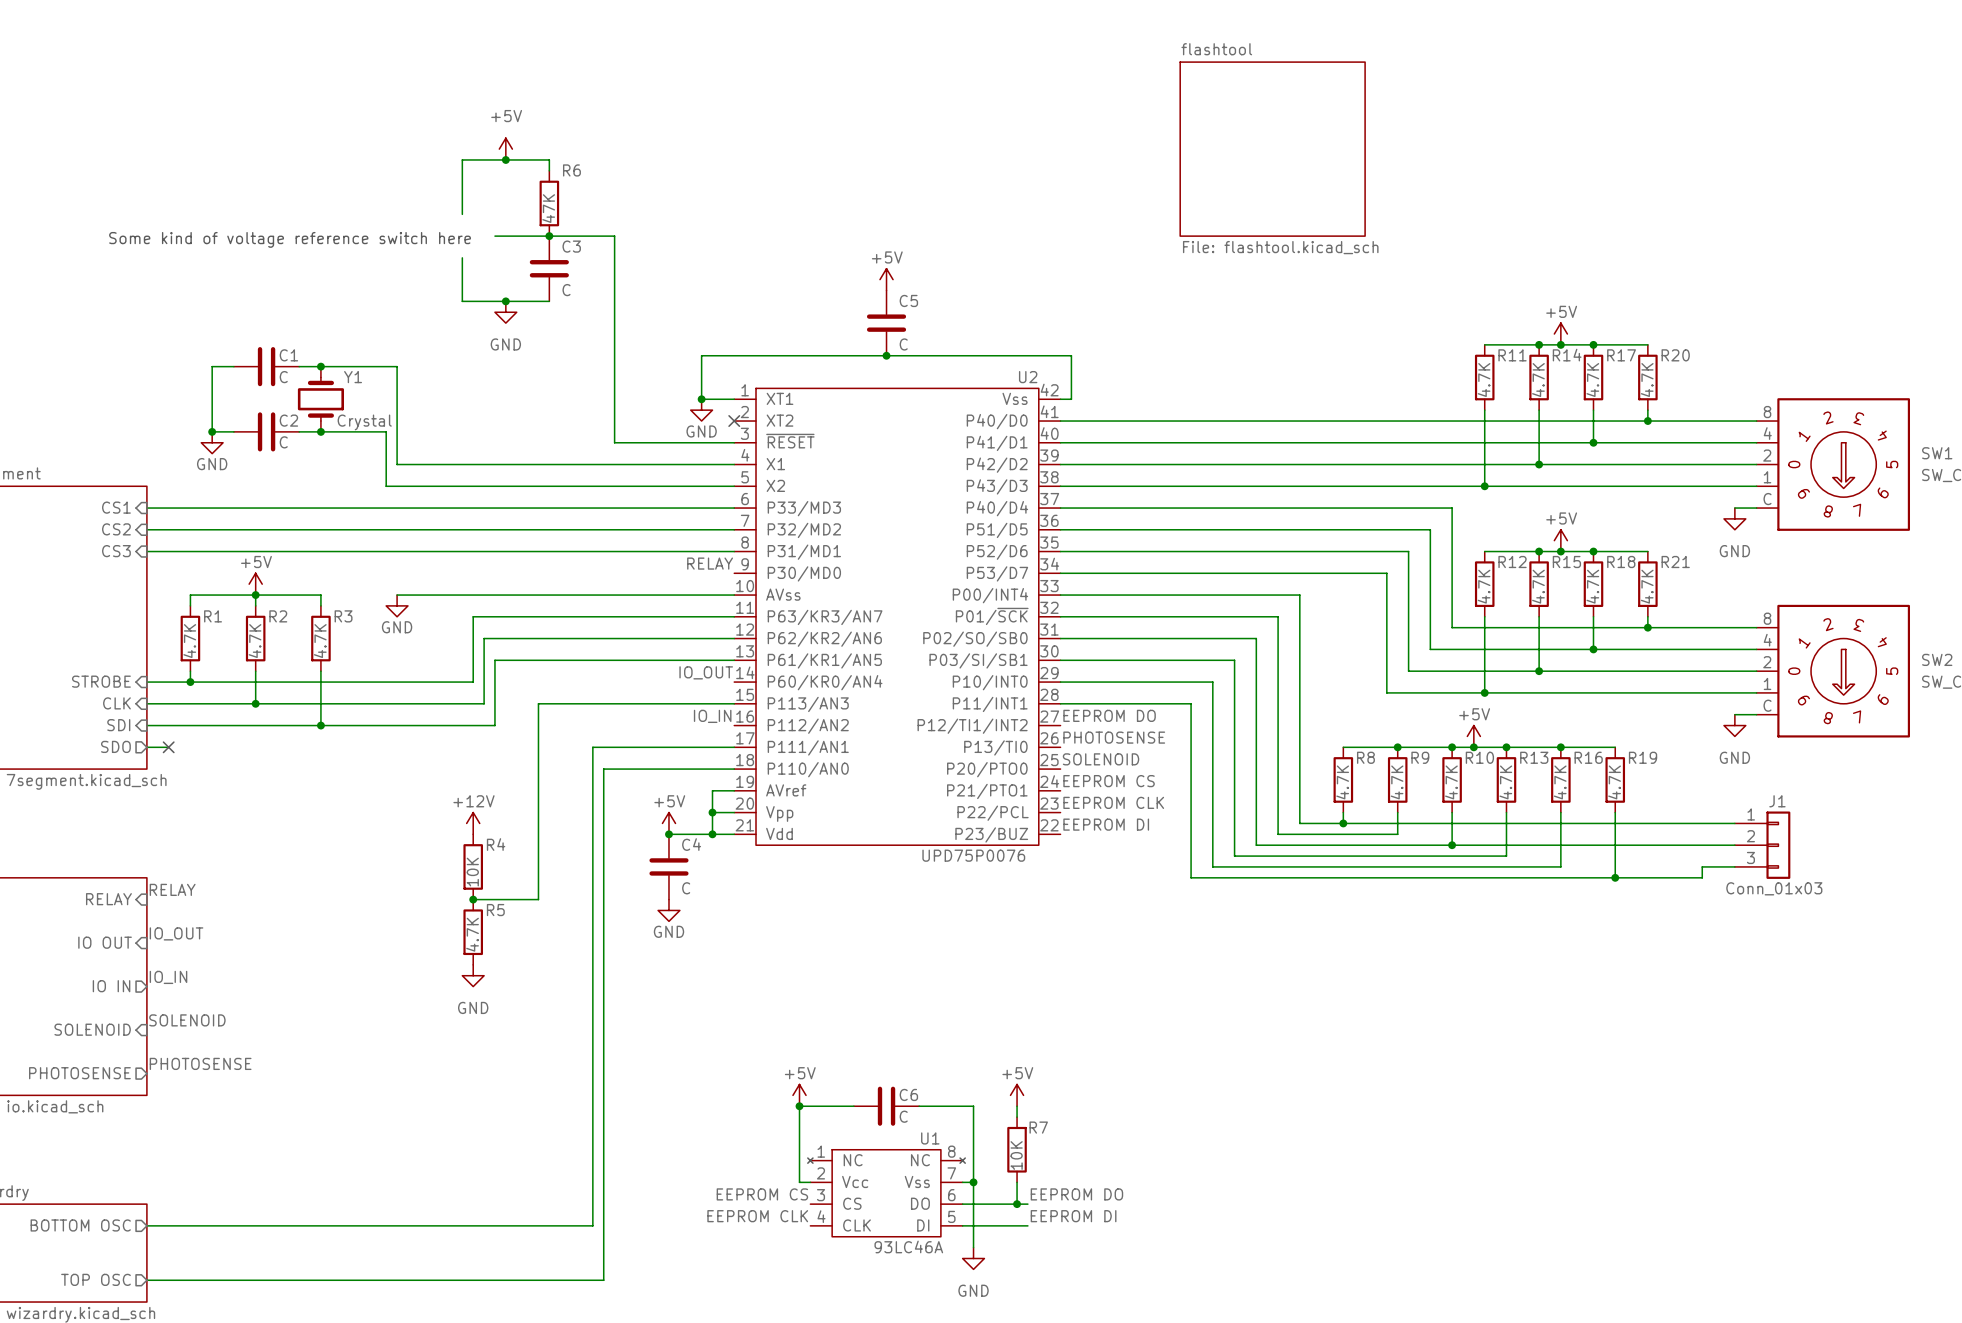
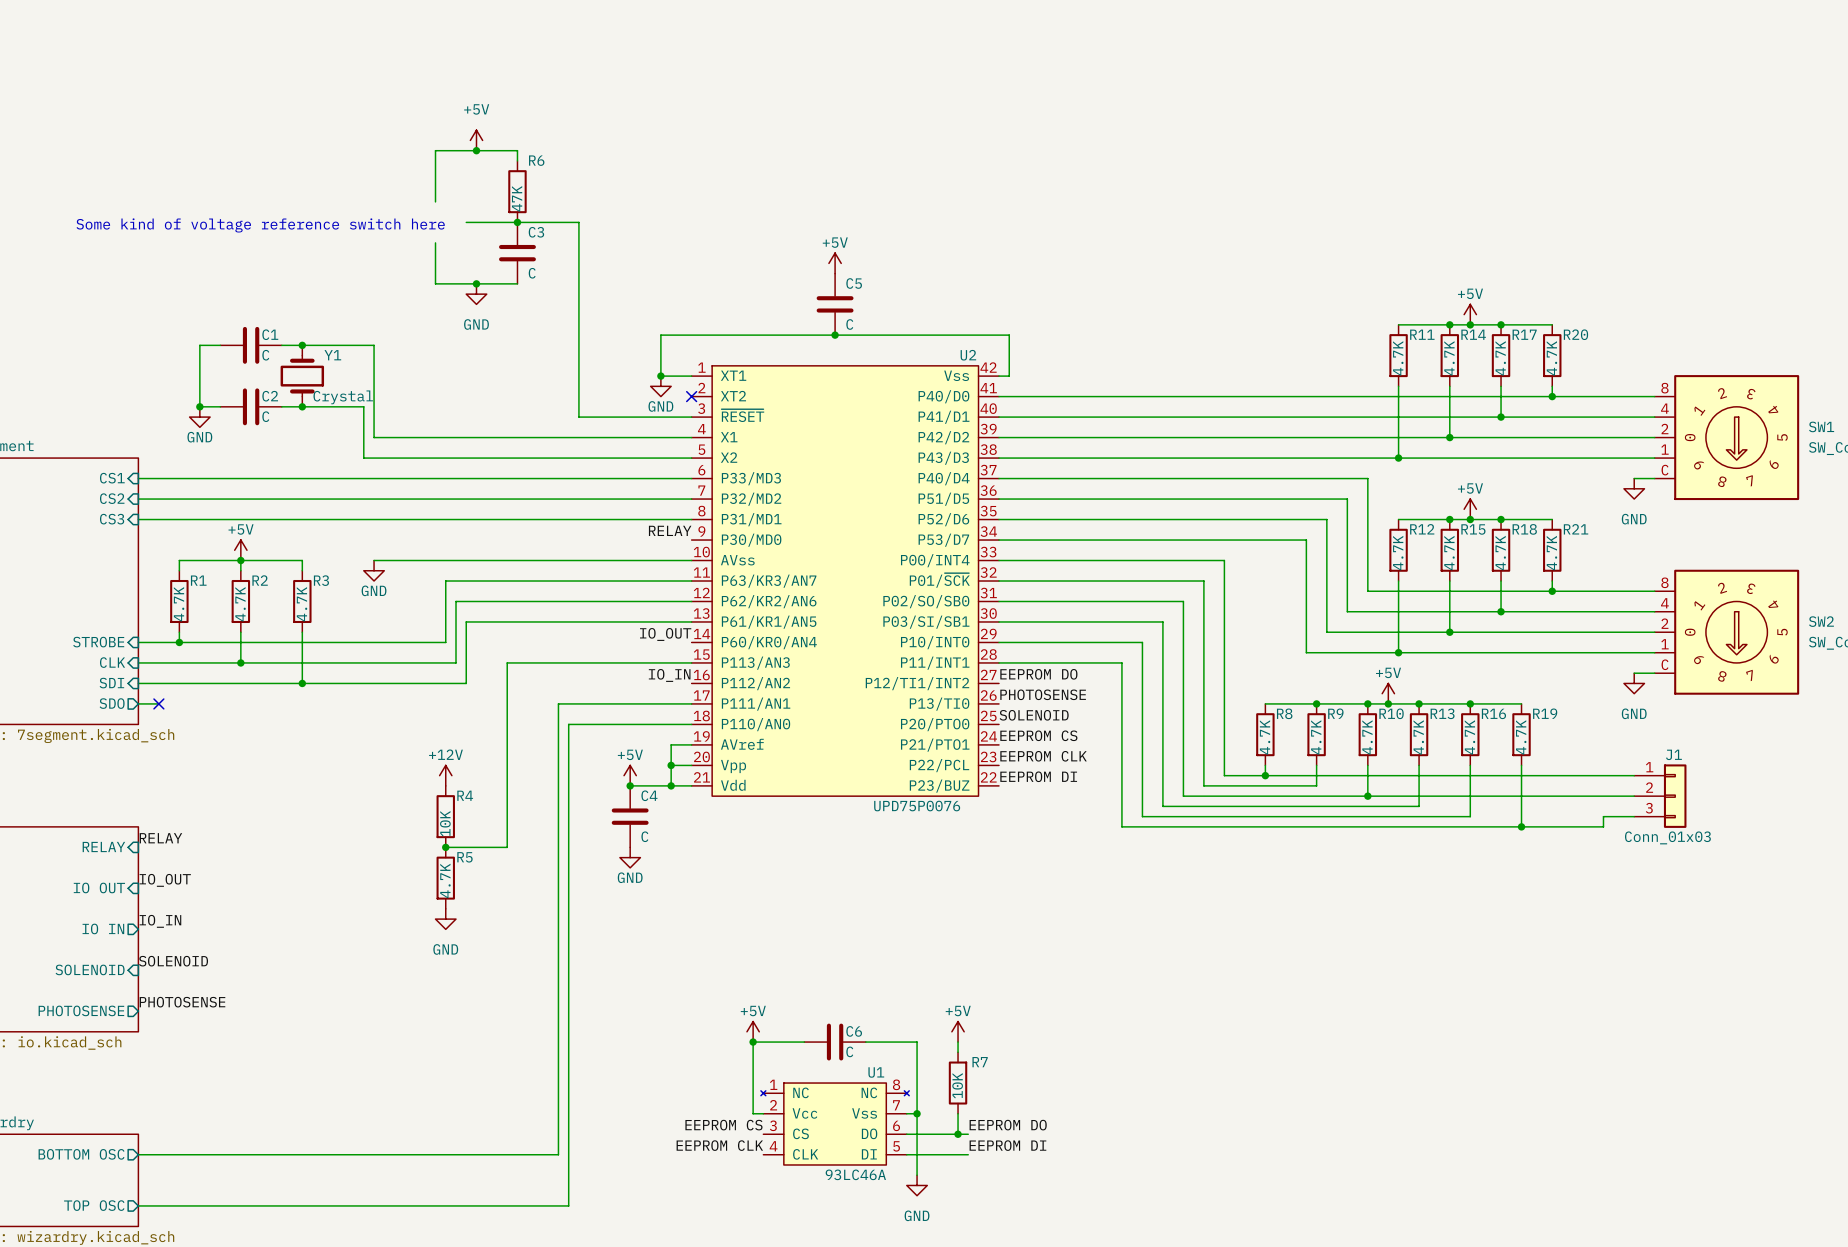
sheet flashtool: File: flashtool.kicad_sch (1272, 149) -> none

